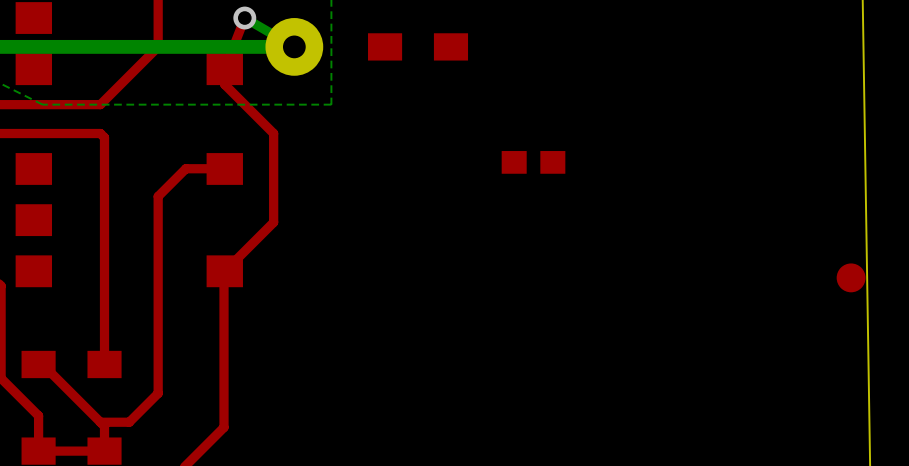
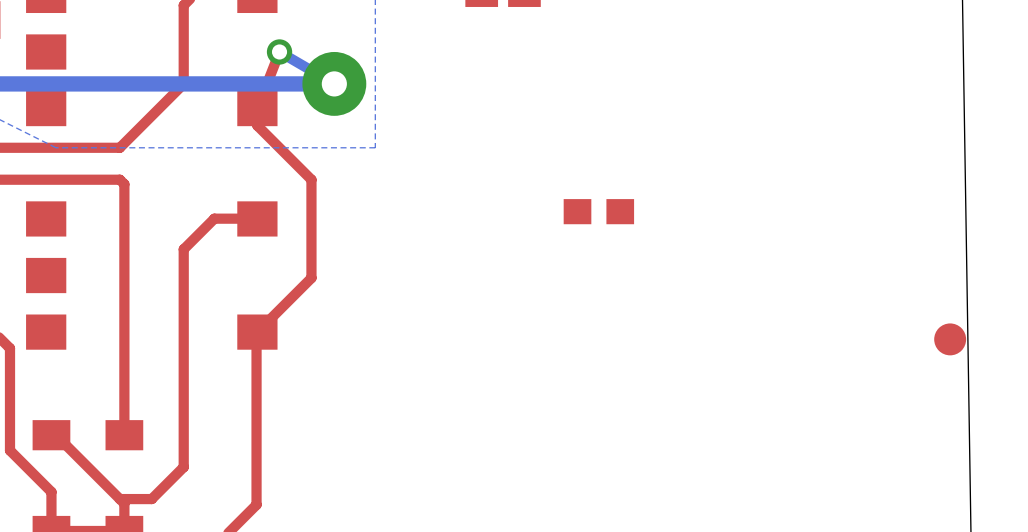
part: (418, 46) -> none

